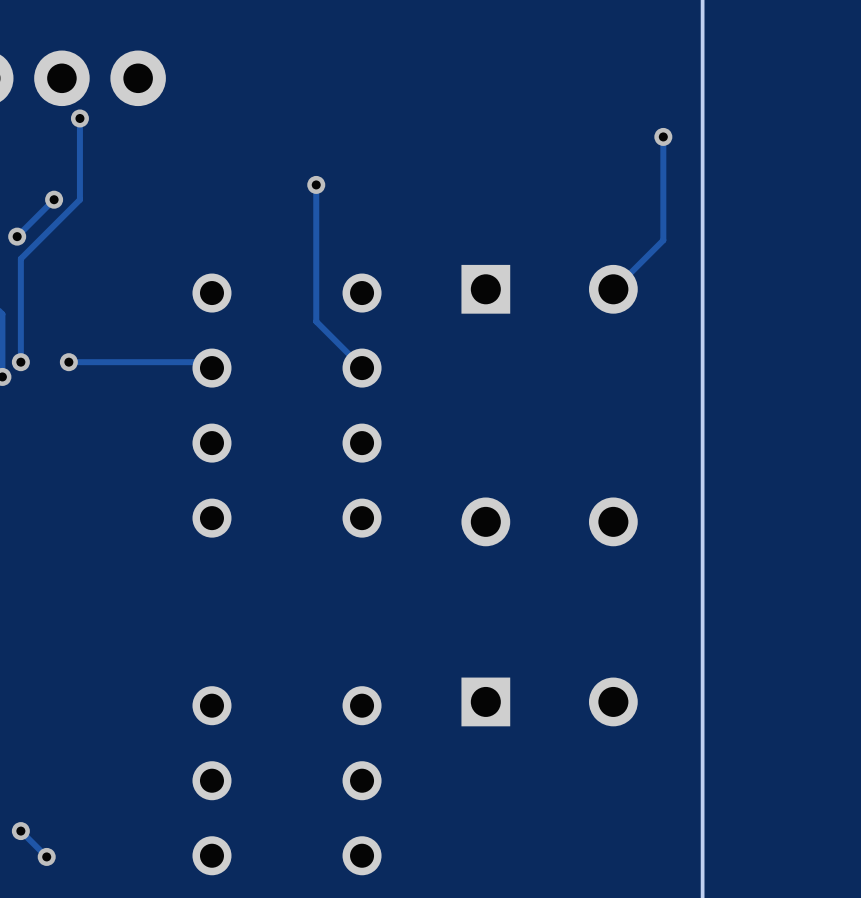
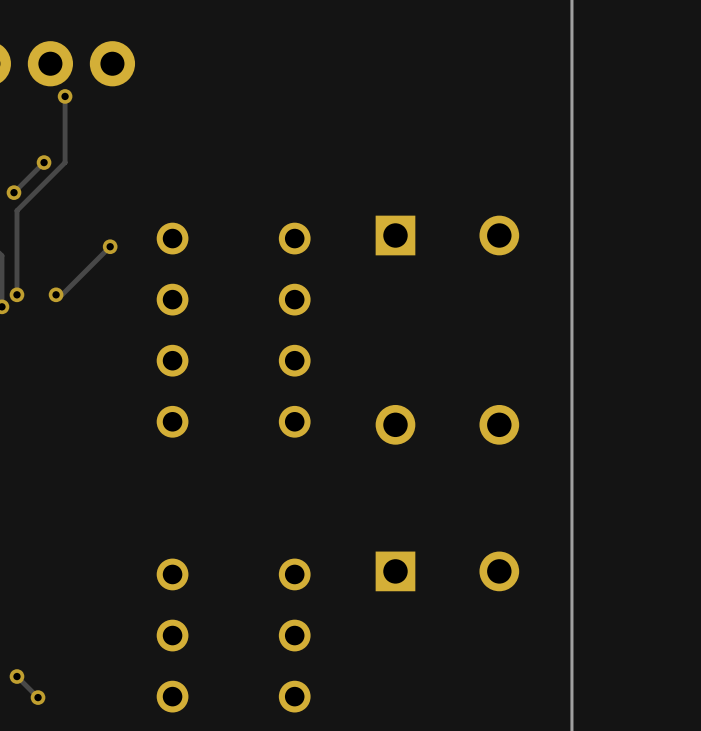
track: (663, 136) (663, 240) (613, 289) -> none
via: (663, 136) -> none
track: (316, 184) (316, 321) (362, 368) -> none
via: (316, 184) -> none
track: none -> (110, 246) (59, 297)
via: none -> (110, 246)
track: (68, 362) (205, 362) (211, 368) -> none

